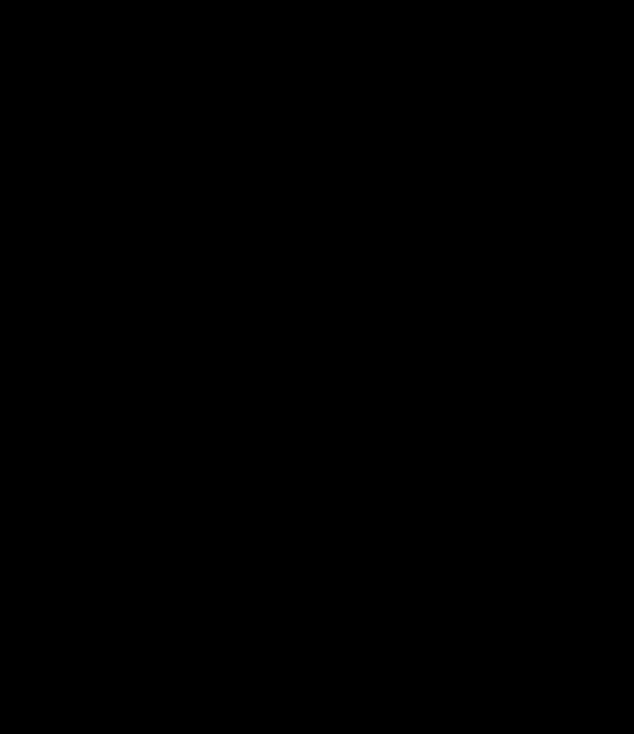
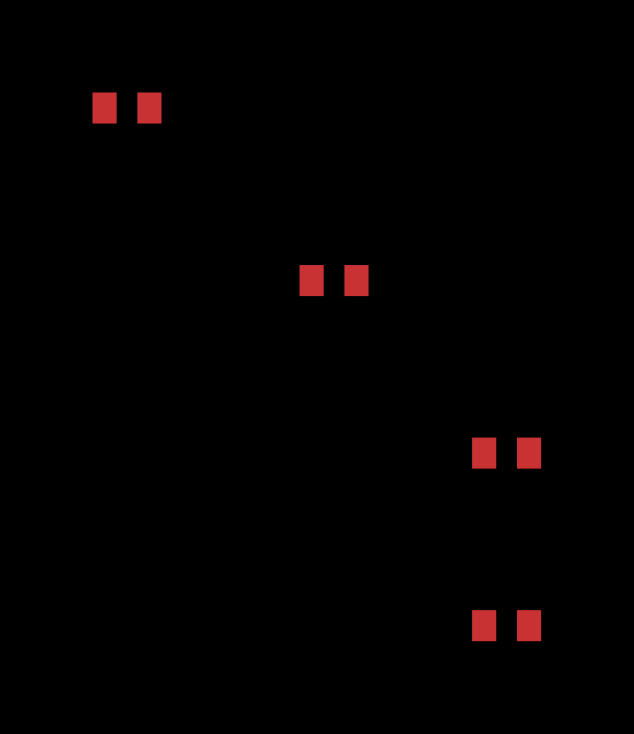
part: none -> (126, 108)
part: none -> (334, 280)
part: none -> (506, 453)
part: none -> (506, 625)

